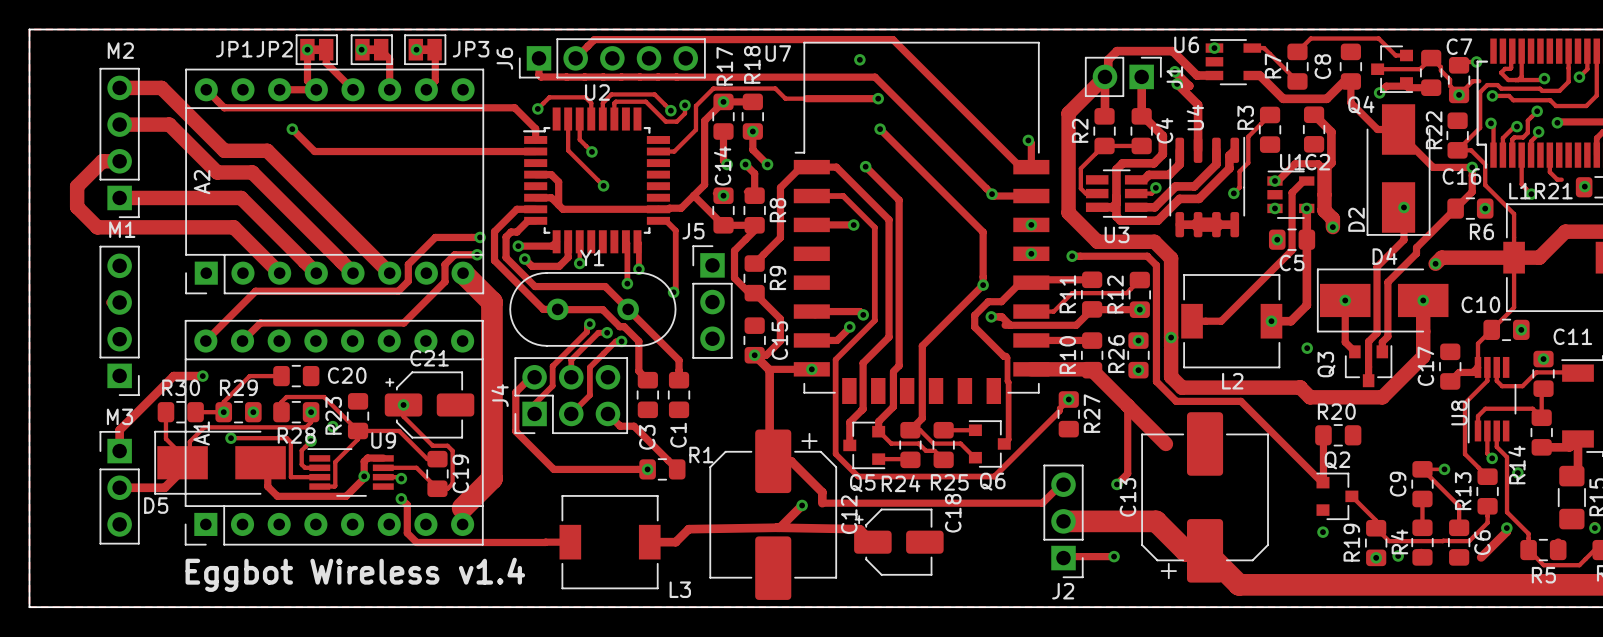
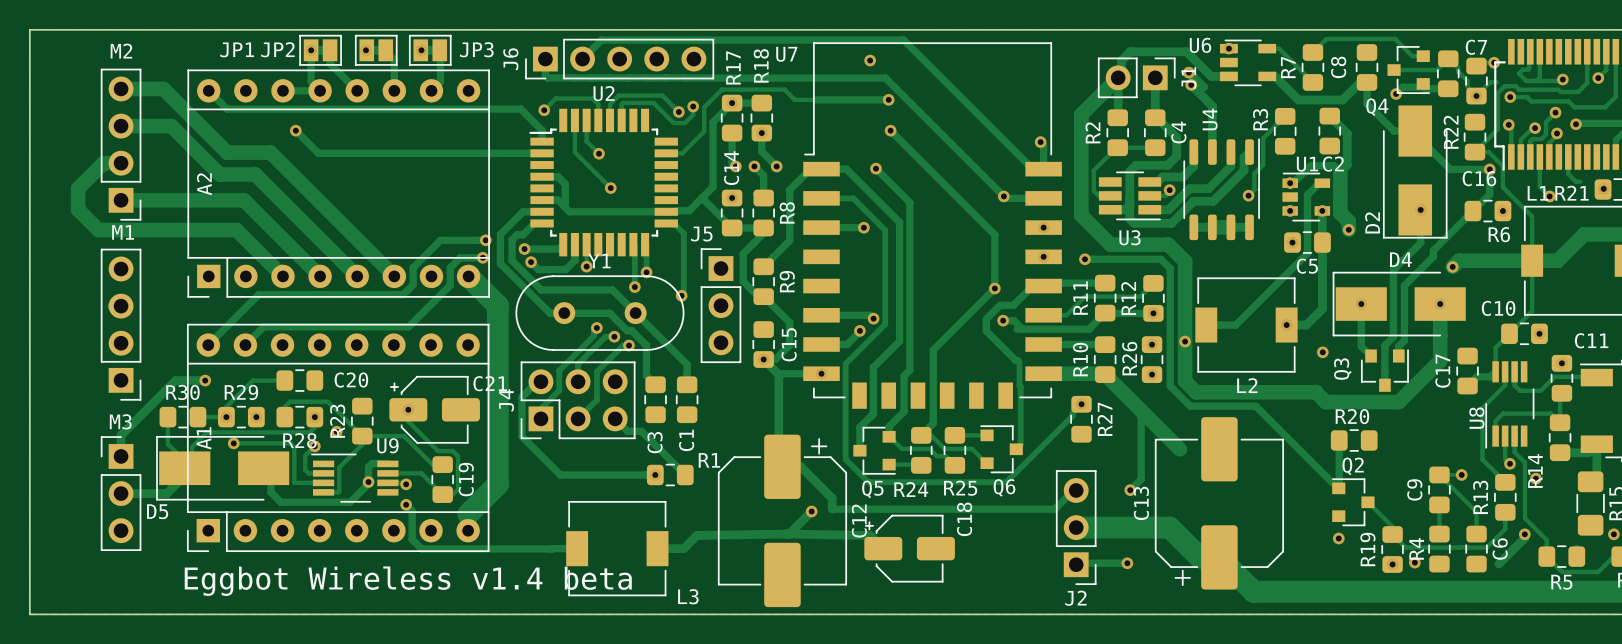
C21 name position: C21 (429, 358) -> C21 (490, 383)
text: Eggbot Wireless v1.4 (355, 574) -> Eggbot Wireless v1.4 beta (408, 581)

